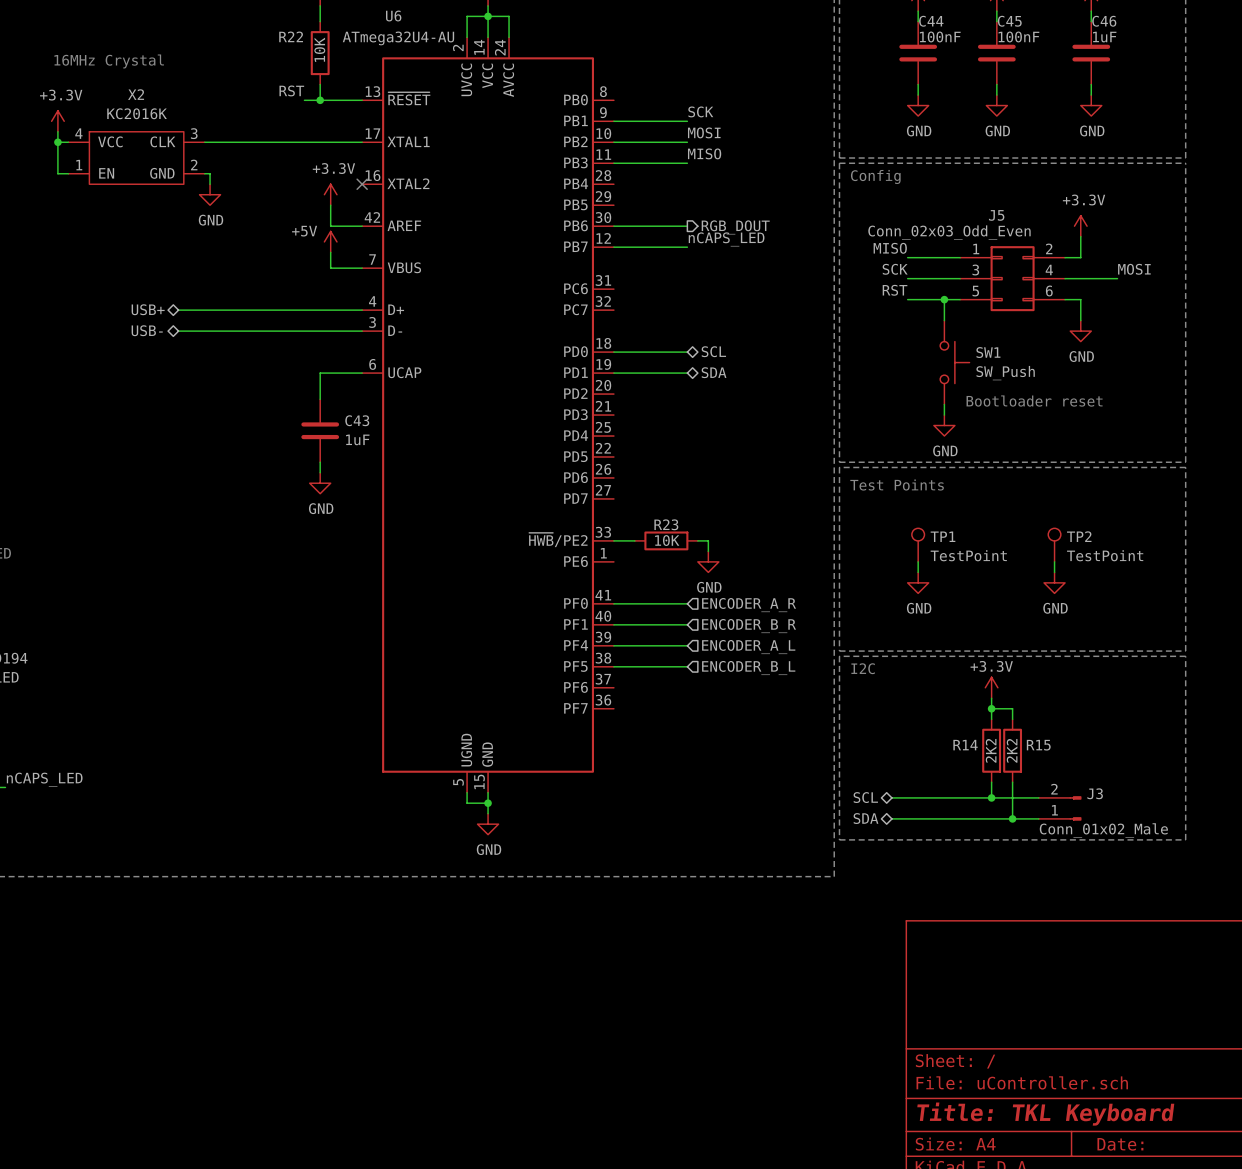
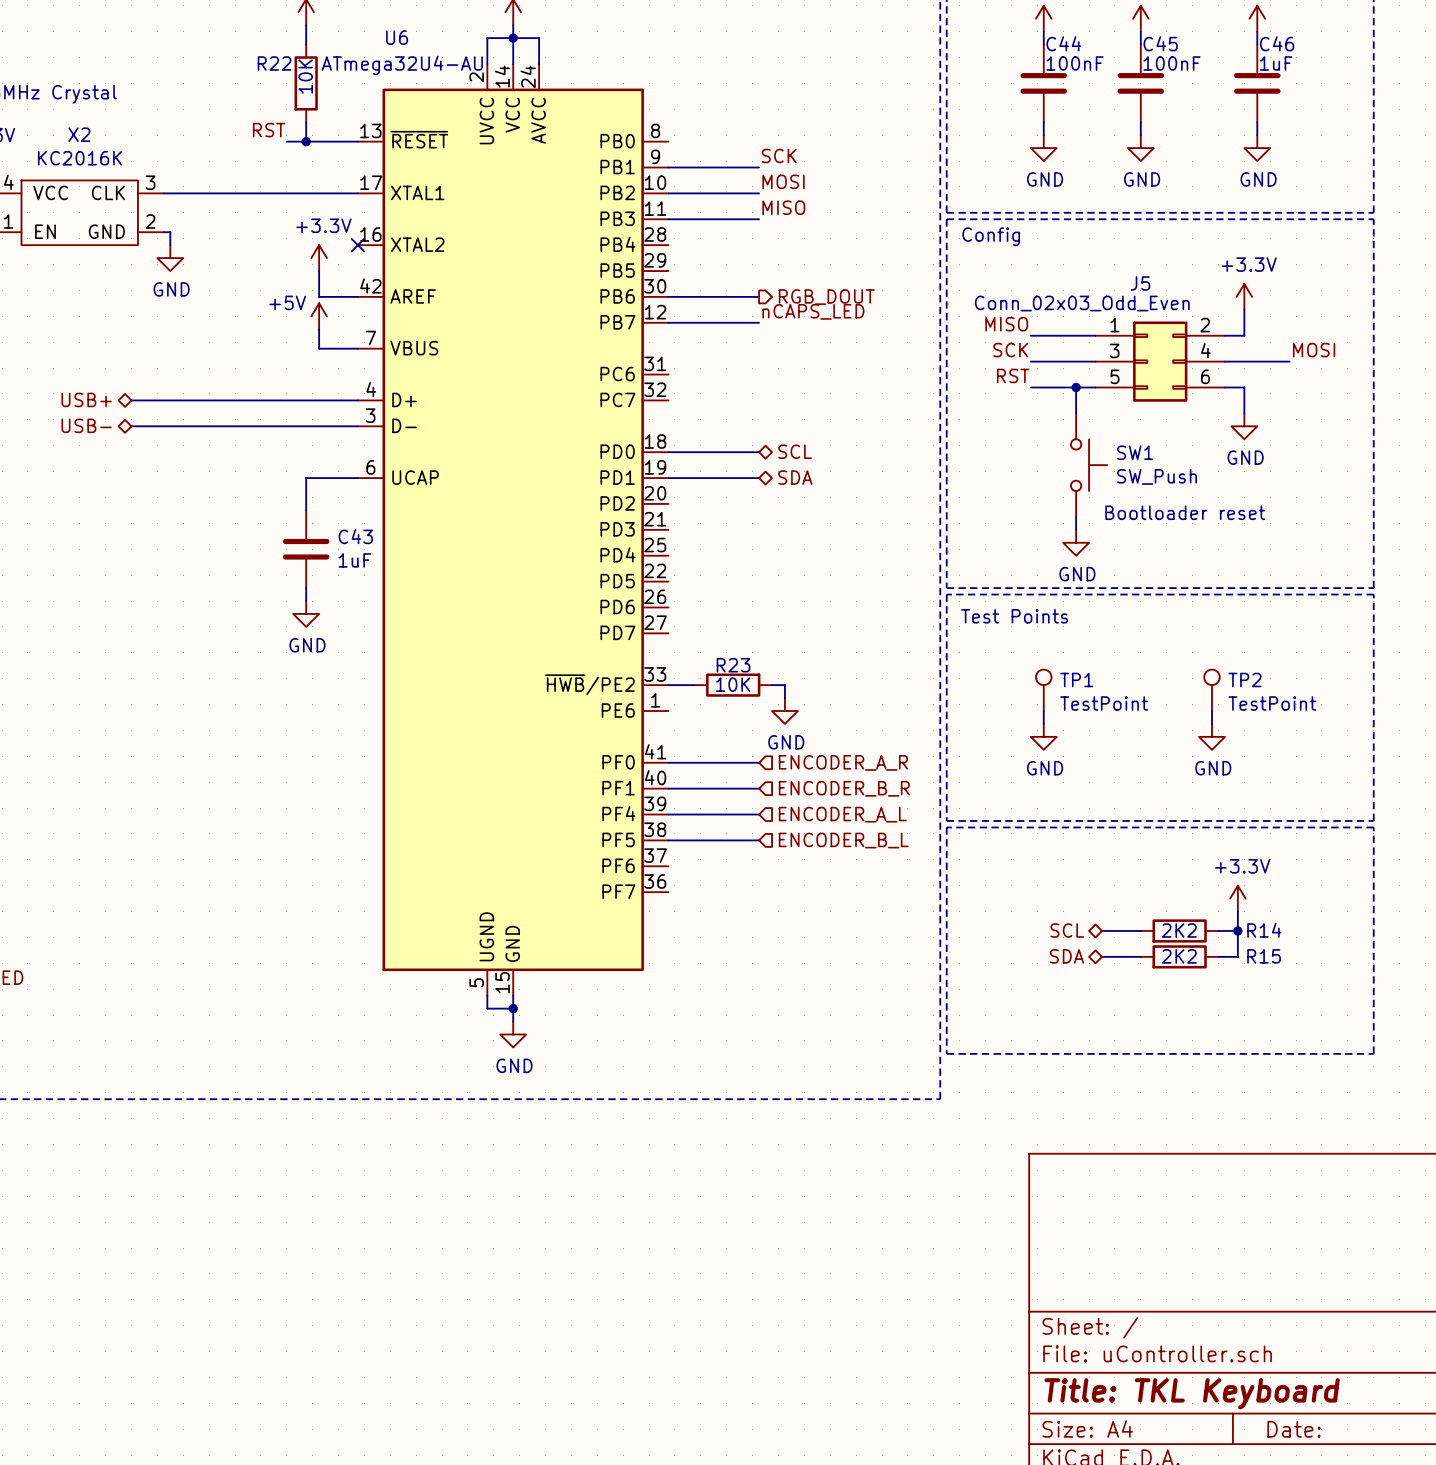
power symbol text position: +3.3V (991, 666) -> +3.3V (1242, 866)
text: I2C (863, 668) -> none
power symbol position: +3.3V (991, 687) -> +3.3V (1237, 898)
wire: (991, 698) (991, 719) -> none
wire: (991, 708) (1012, 708) (1012, 719) -> none
junction: (991, 708) -> none
wire: none -> (1237, 911) (1237, 956) (1218, 956)
wire: none -> (1102, 930) (1140, 930)
wire: none -> (1218, 930) (1237, 930)
junction: none -> (1237, 930)
R14 name position: R14 (965, 745) -> R14 (1264, 930)
R15 name position: R15 (1038, 745) -> R15 (1264, 956)
R14 rotation: 0° (991, 750) -> 90° clockwise (1179, 930)
R14 position: (991, 750) -> (1179, 930)
R15 rotation: 0° (1012, 750) -> 90° clockwise (1179, 956)
wire: none -> (1102, 956) (1140, 956)
wire: (991, 782) (991, 797) -> none
wire: (1012, 782) (1012, 818) -> none
hierarchical label position: SCL (865, 797) -> SCL (1067, 930)
wire: (891, 797) (1038, 797) -> none
junction: (991, 797) -> none
J3: Conn_01x02_Male (1060, 808) -> none
hierarchical label position: SDA (865, 818) -> SDA (1066, 956)
wire: (891, 818) (1038, 818) -> none
junction: (1012, 818) -> none

